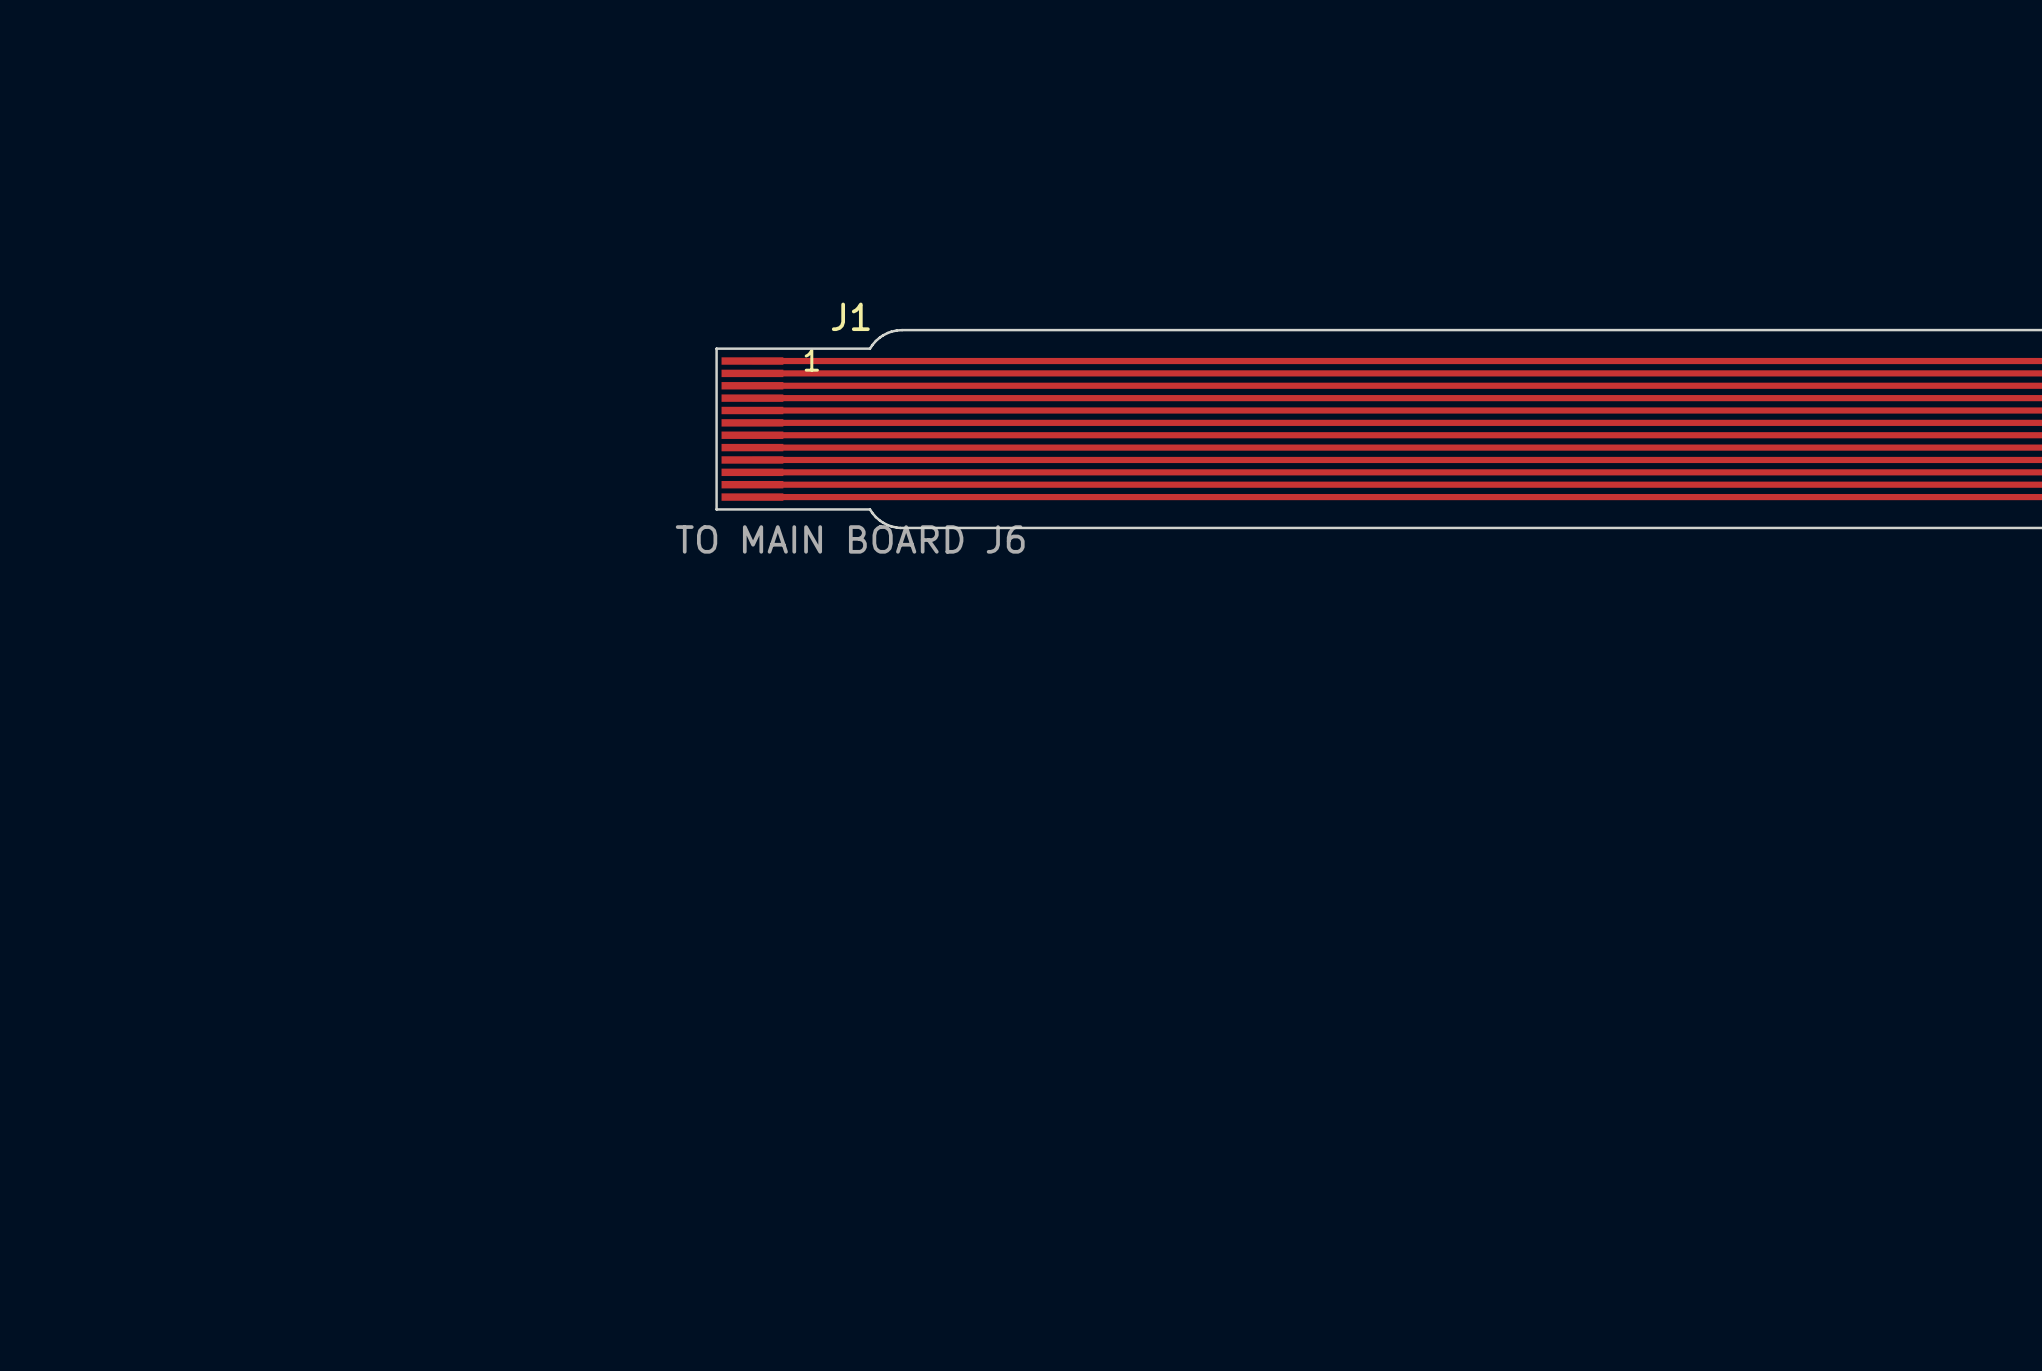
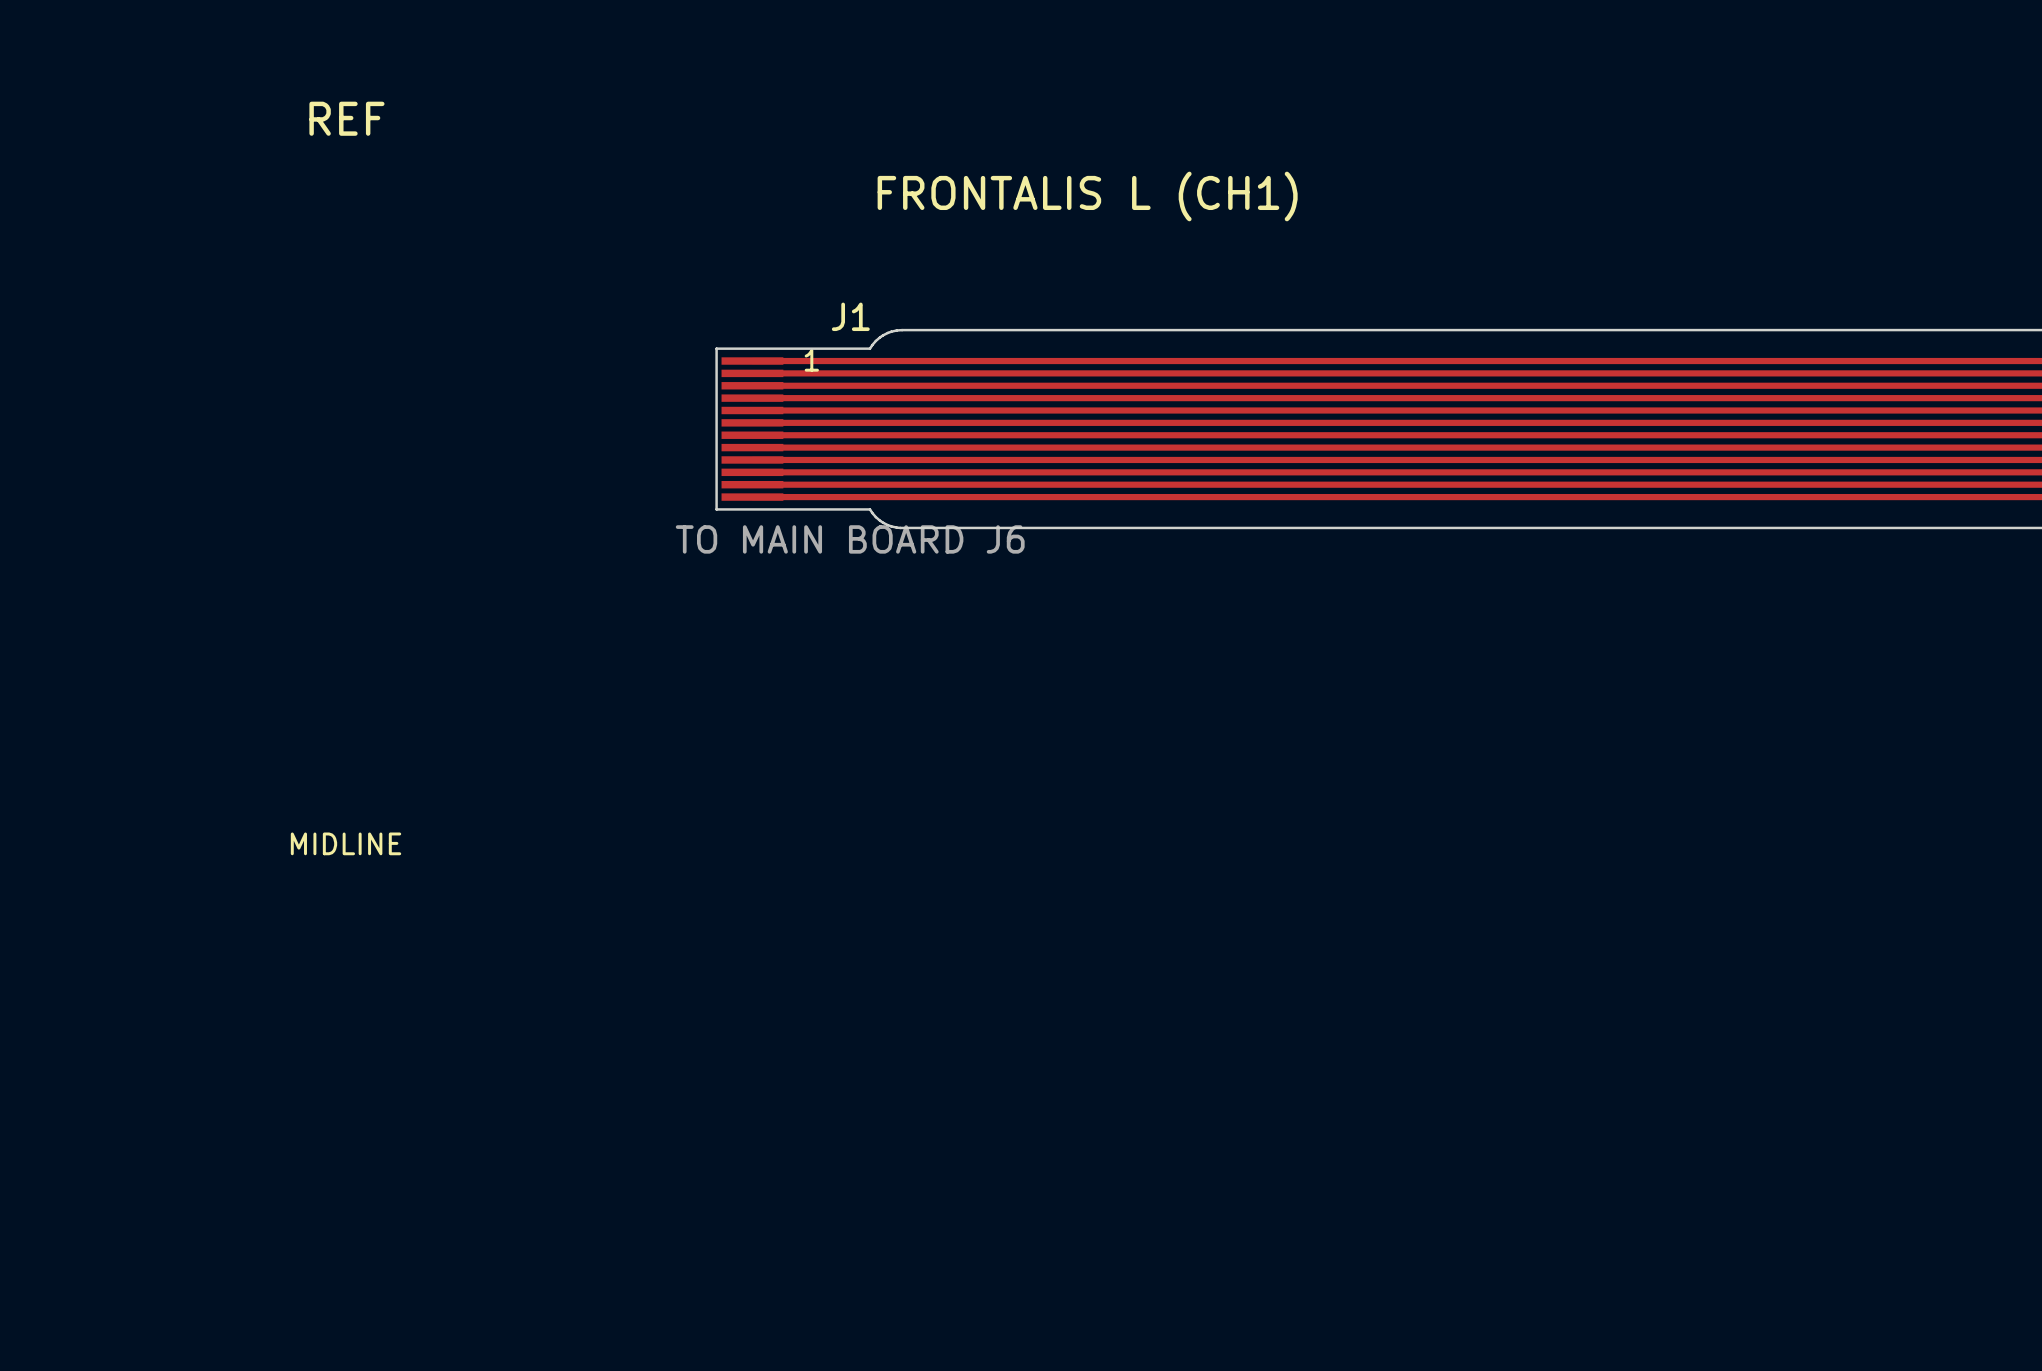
text: none -> REF (346, 118)
text: none -> FRONTALIS L (CH1) (1087, 196)
text: none -> MIDLINE (346, 843)

